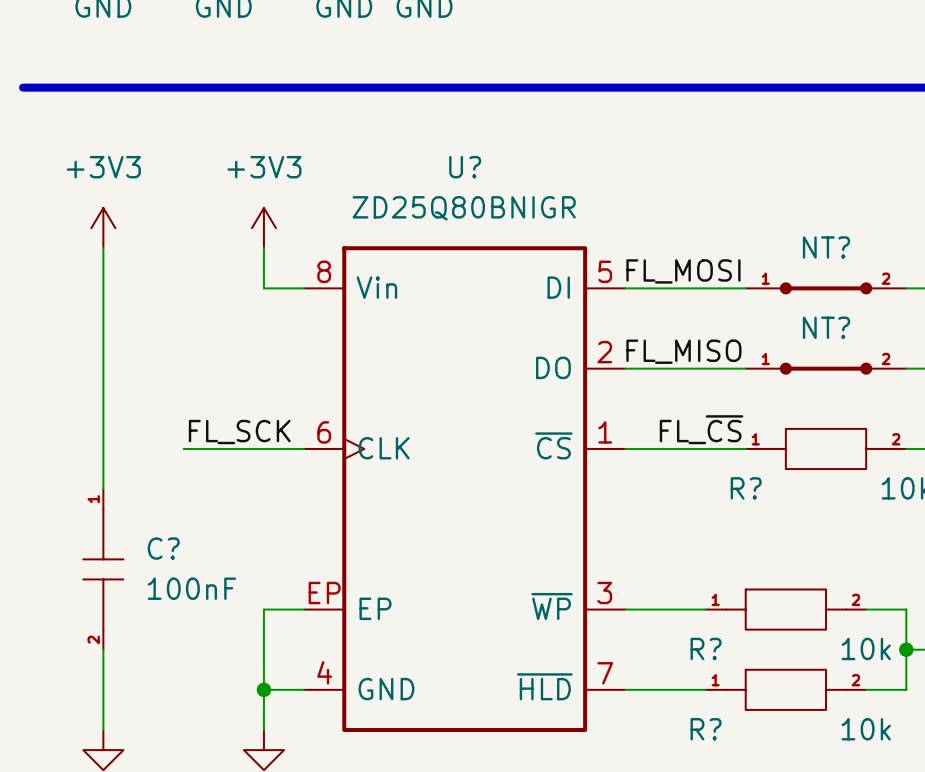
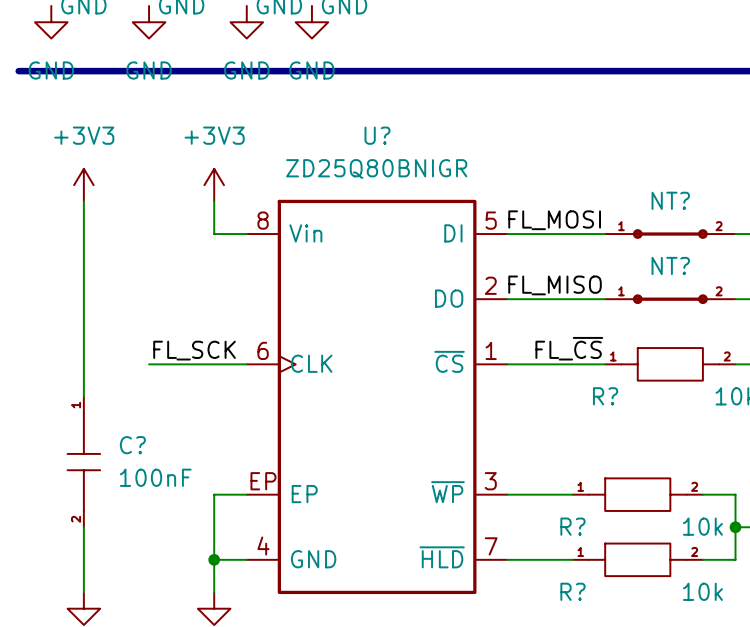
power symbol: none -> GND (51, 22)
power symbol: none -> GND (149, 22)
power symbol: none -> GND (246, 22)
power symbol: none -> GND (311, 22)

